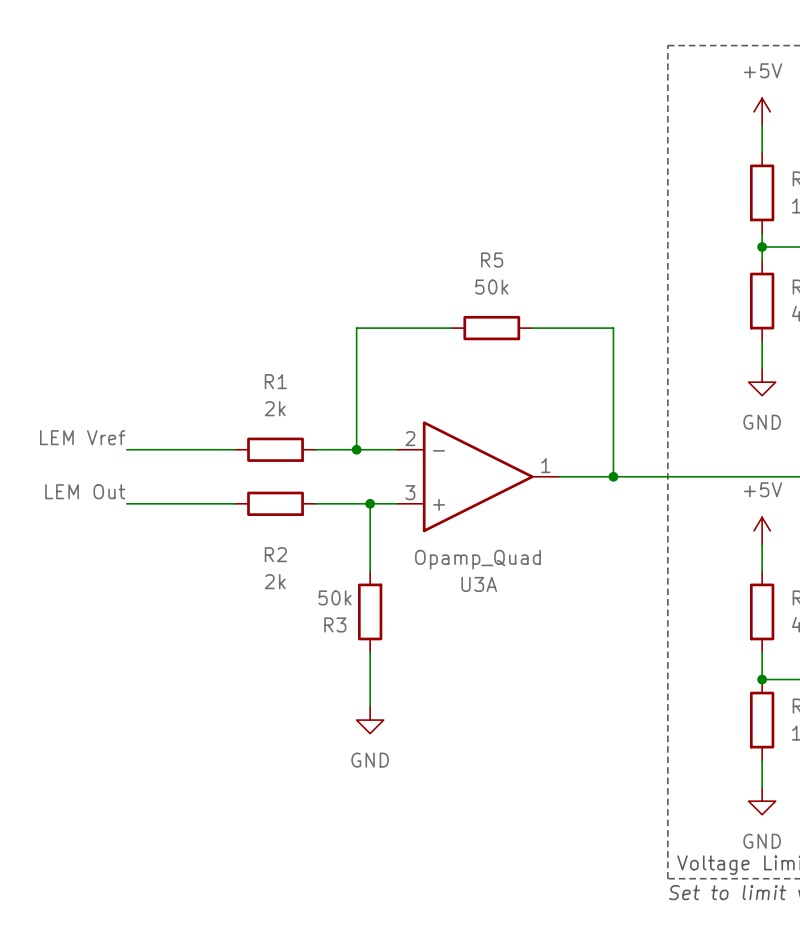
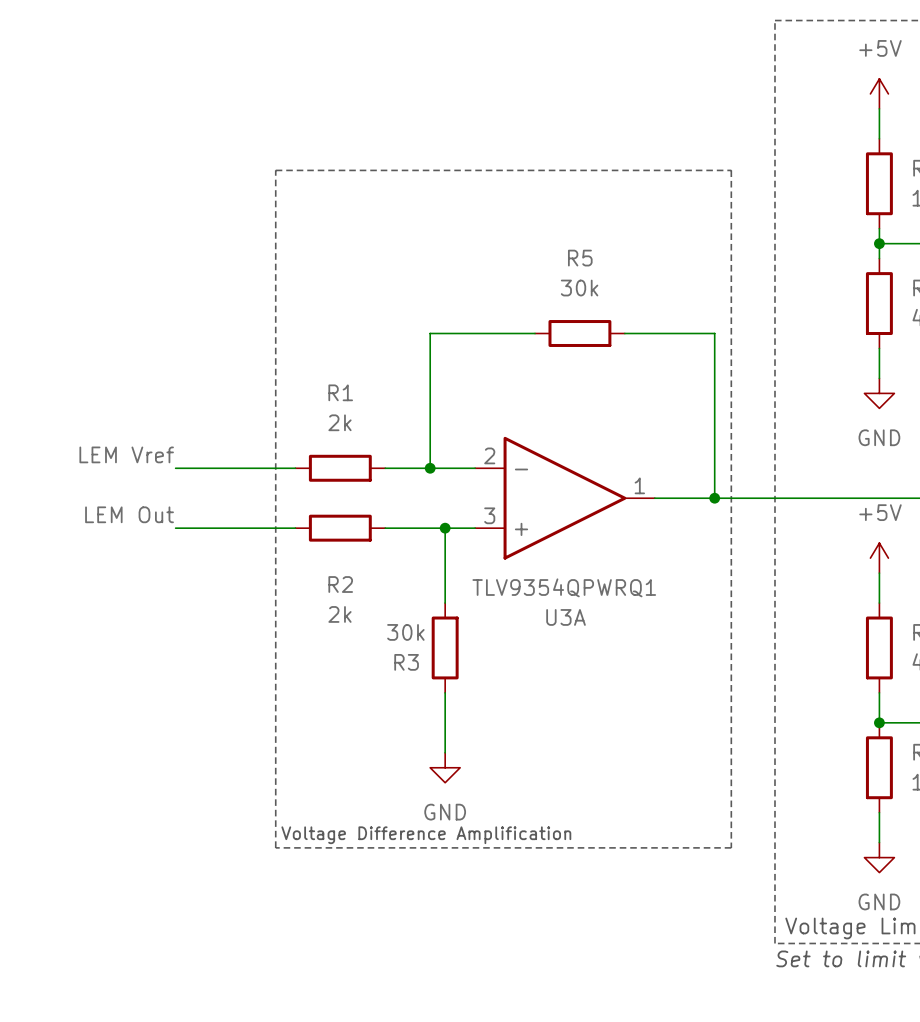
line: none -> (275, 170) (731, 170) (731, 847) (275, 847) (275, 170)
R5 value: 50k (491, 287) -> 30k (579, 288)
U3A value: Opamp_Quad (477, 559) -> TLV9354QPWRQ1 (564, 587)
R3 value: 50k (335, 597) -> 30k (405, 632)
text: none -> Voltage Difference Amplification (426, 835)

